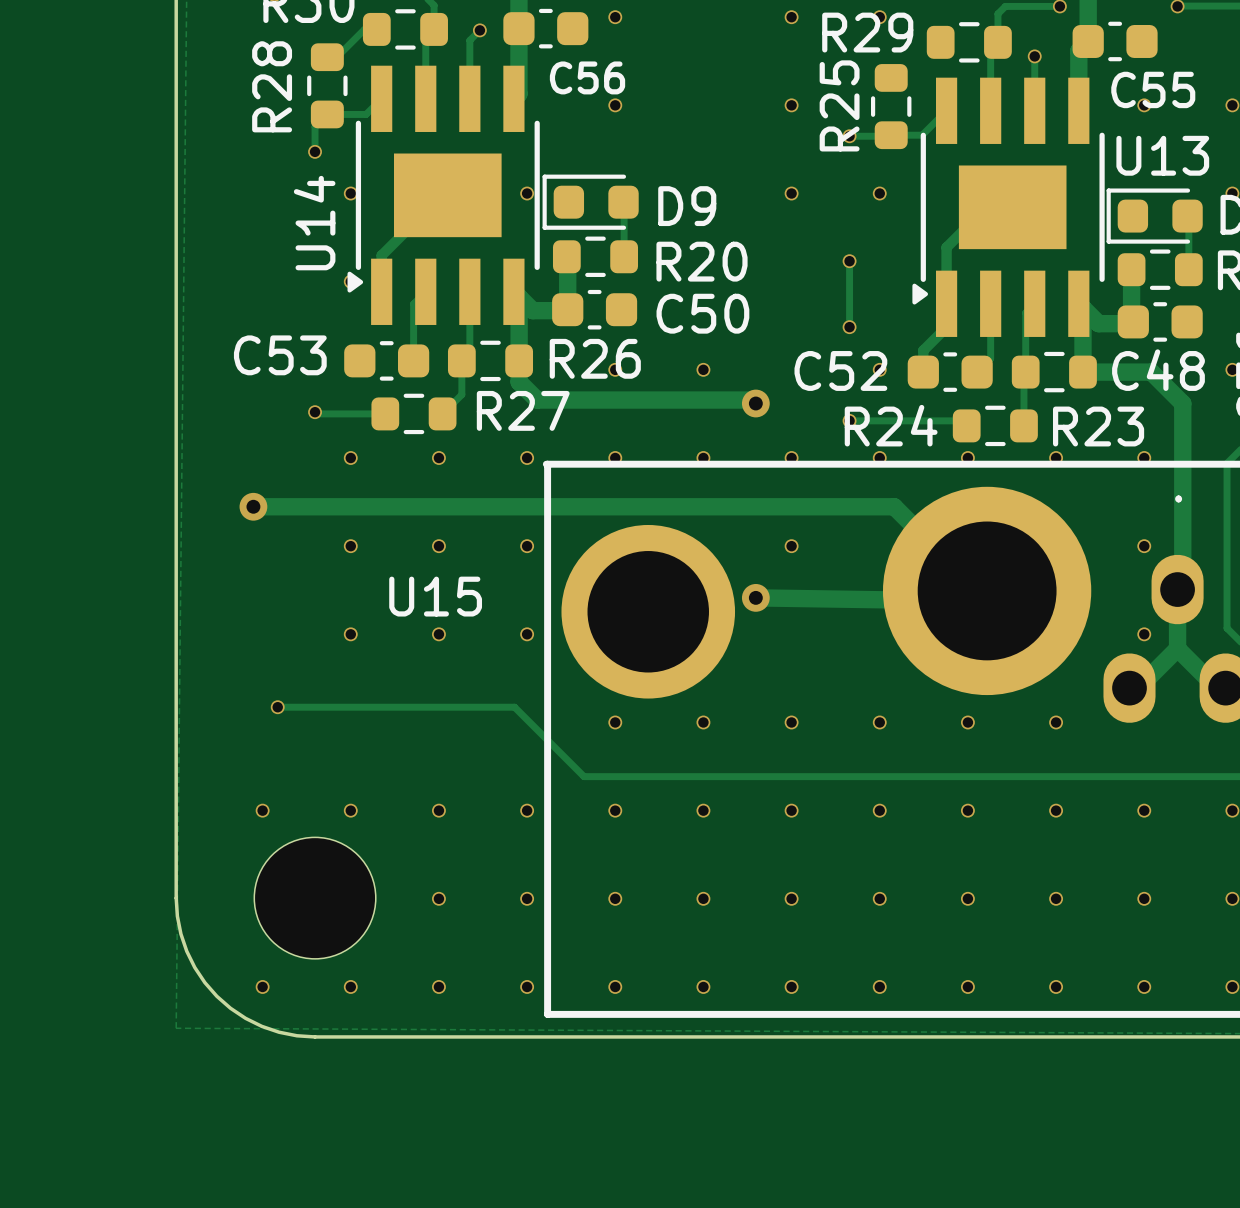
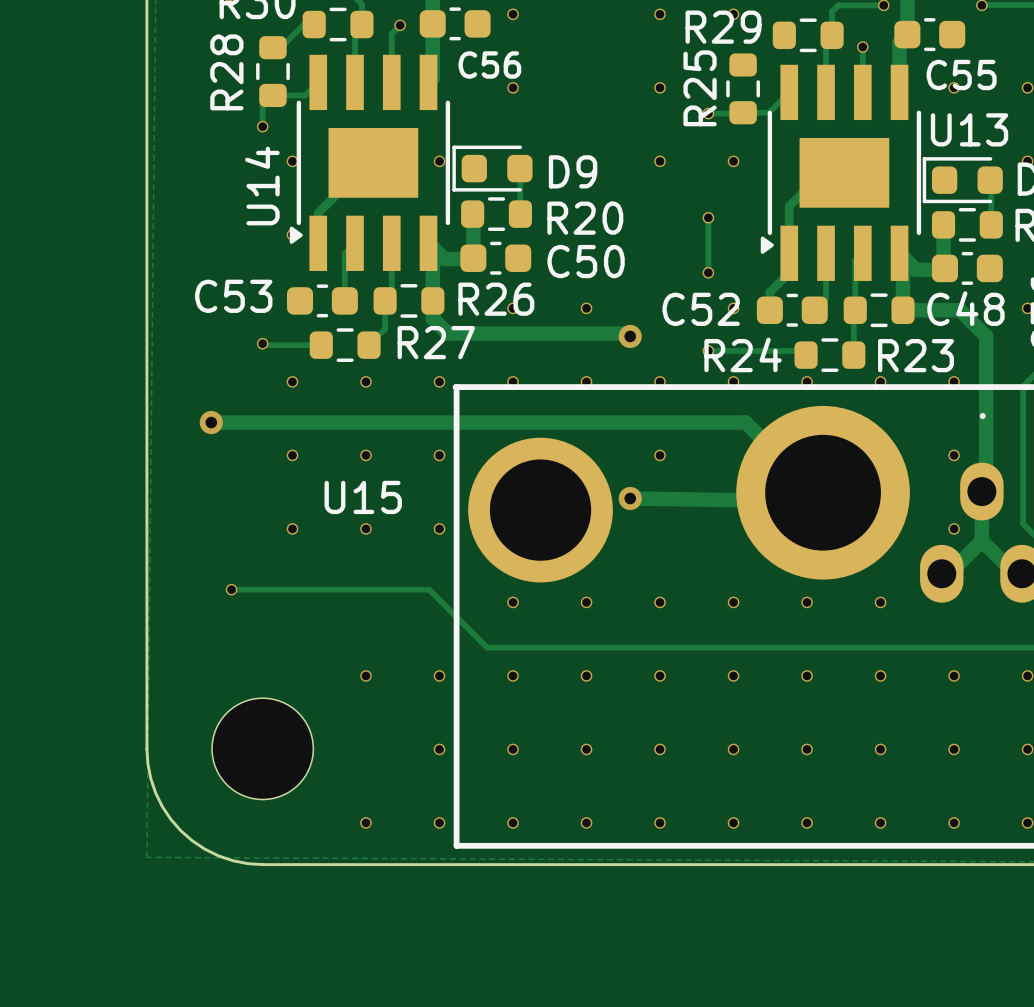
via: (262, 810) -> none
via: (350, 810) -> none
via: (438, 898) -> none
via: (262, 986) -> none
via: (350, 986) -> none

